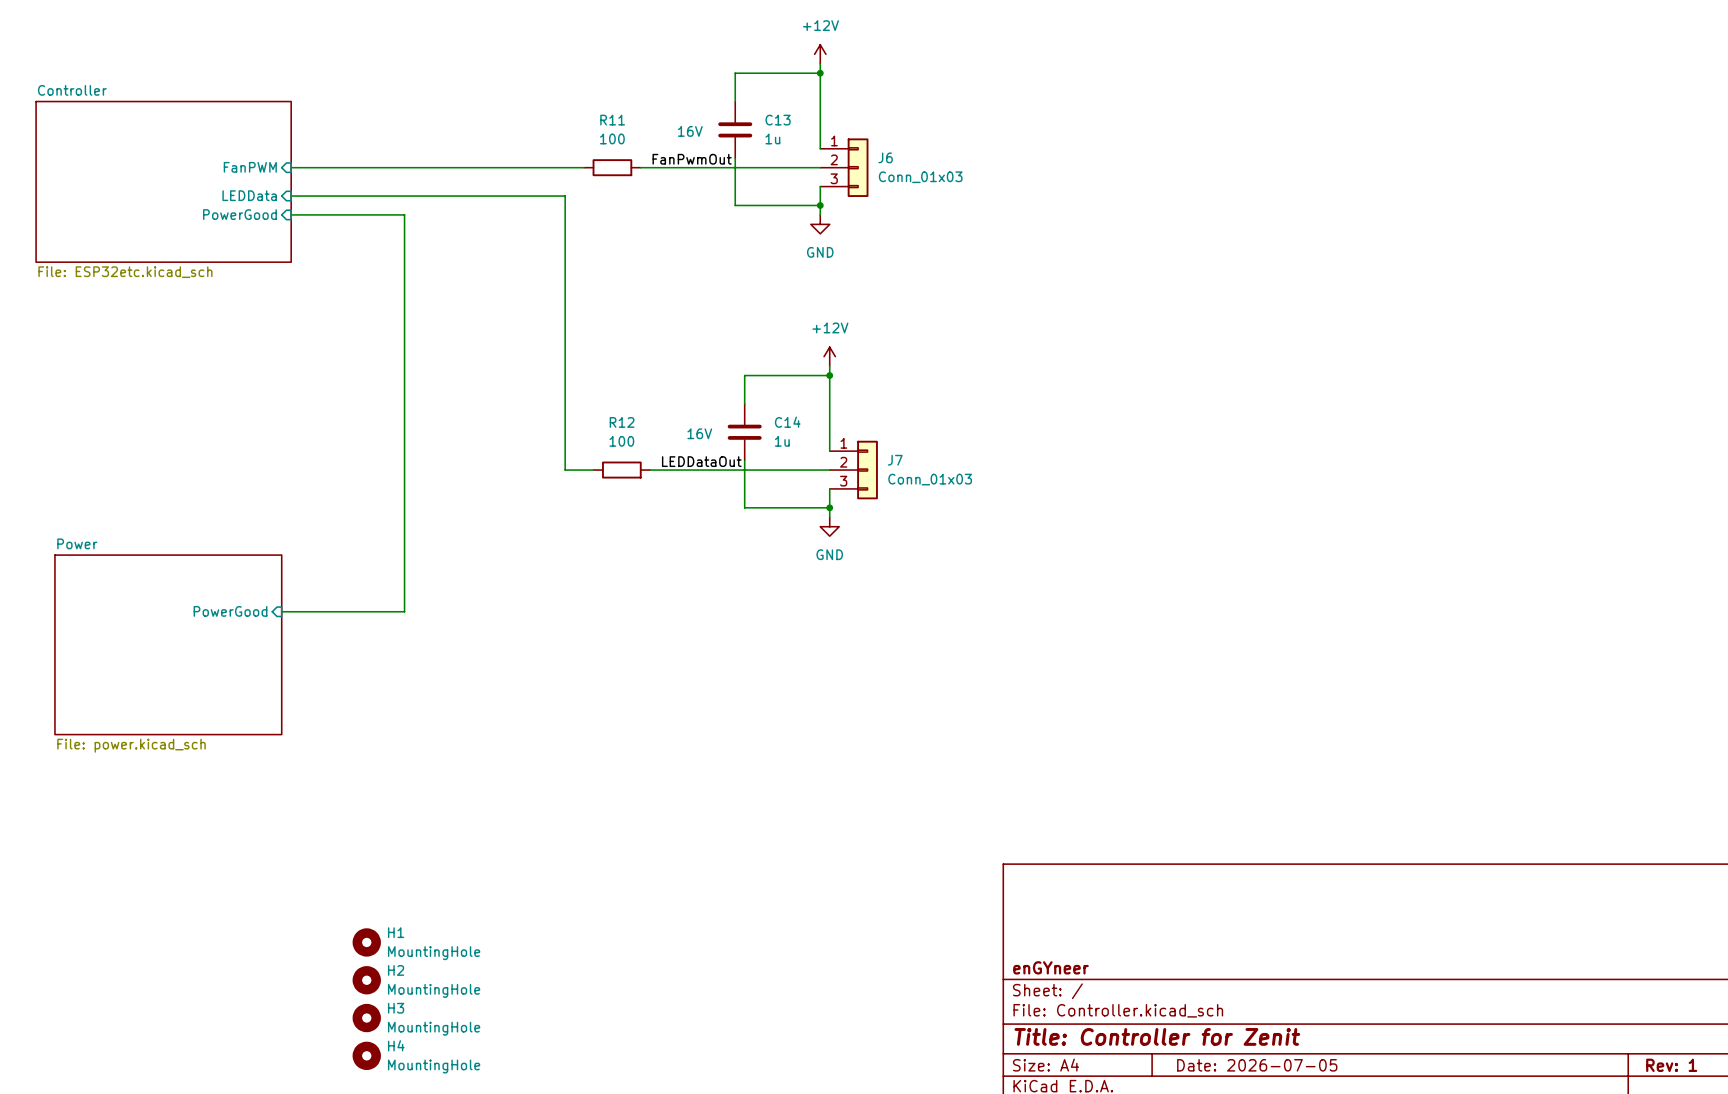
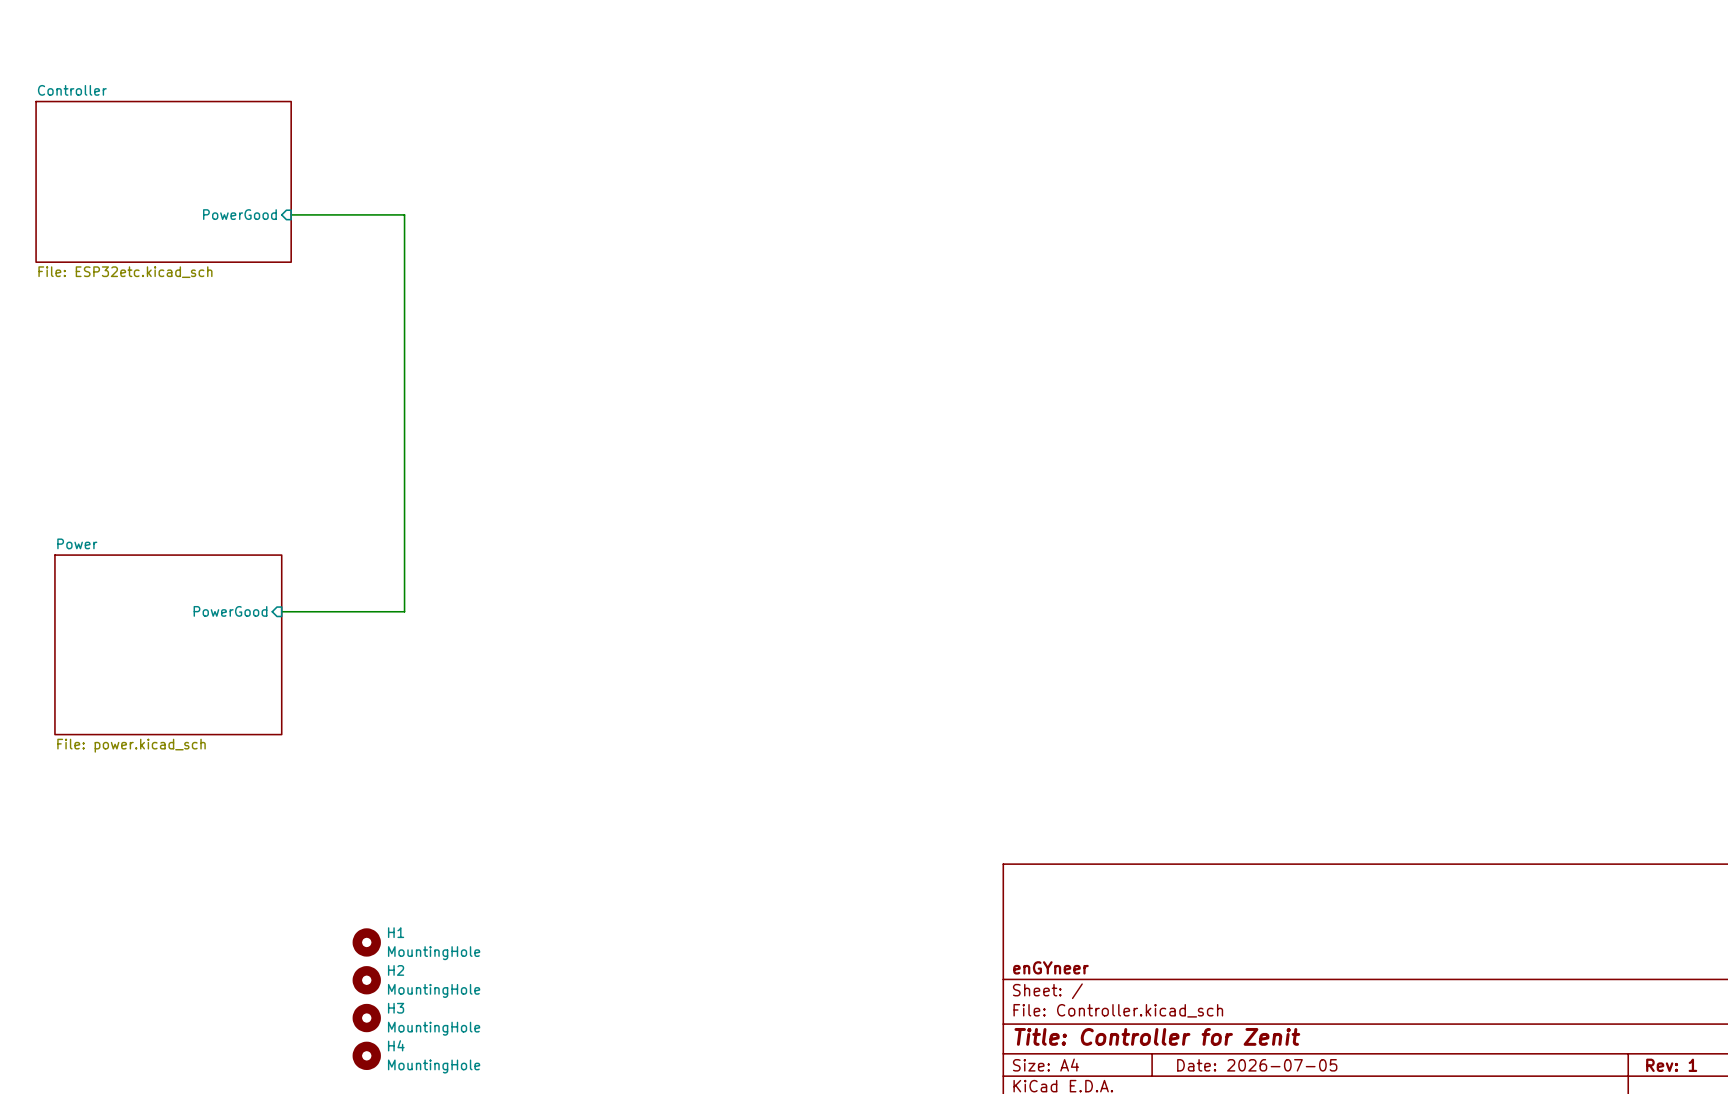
power symbol: +12V (820, 54) -> none
wire: (820, 63) (820, 148) -> none
wire: (820, 73) (735, 73) (735, 101) -> none
junction: (820, 73) -> none
C13: 1u (735, 129) -> none
wire: (735, 158) (735, 205) (820, 205) -> none
label: FanPwmOut (692, 159) -> none
sheet pin: FanPWM (250, 167) -> none
wire: (291, 167) (584, 167) -> none
R11: 100 (612, 167) -> none
wire: (640, 167) (820, 167) -> none
J6: Conn_01x03 (844, 167) -> none
wire: (820, 186) (820, 214) -> none
sheet pin: LEDData (249, 195) -> none
wire: (291, 196) (565, 196) (565, 470) (593, 470) -> none
junction: (820, 205) -> none
power symbol: GND (820, 224) -> none
power symbol: +12V (829, 356) -> none
wire: (829, 366) (829, 451) -> none
wire: (829, 375) (744, 375) (744, 403) -> none
junction: (829, 375) -> none
C14: 1u (744, 432) -> none
wire: (744, 460) (744, 507) (829, 507) -> none
label: LEDDataOut (701, 461) -> none
R12: 100 (621, 470) -> none
wire: (650, 470) (829, 470) -> none
J7: Conn_01x03 (853, 470) -> none
wire: (829, 488) (829, 517) -> none
junction: (829, 507) -> none
power symbol: GND (829, 526) -> none

